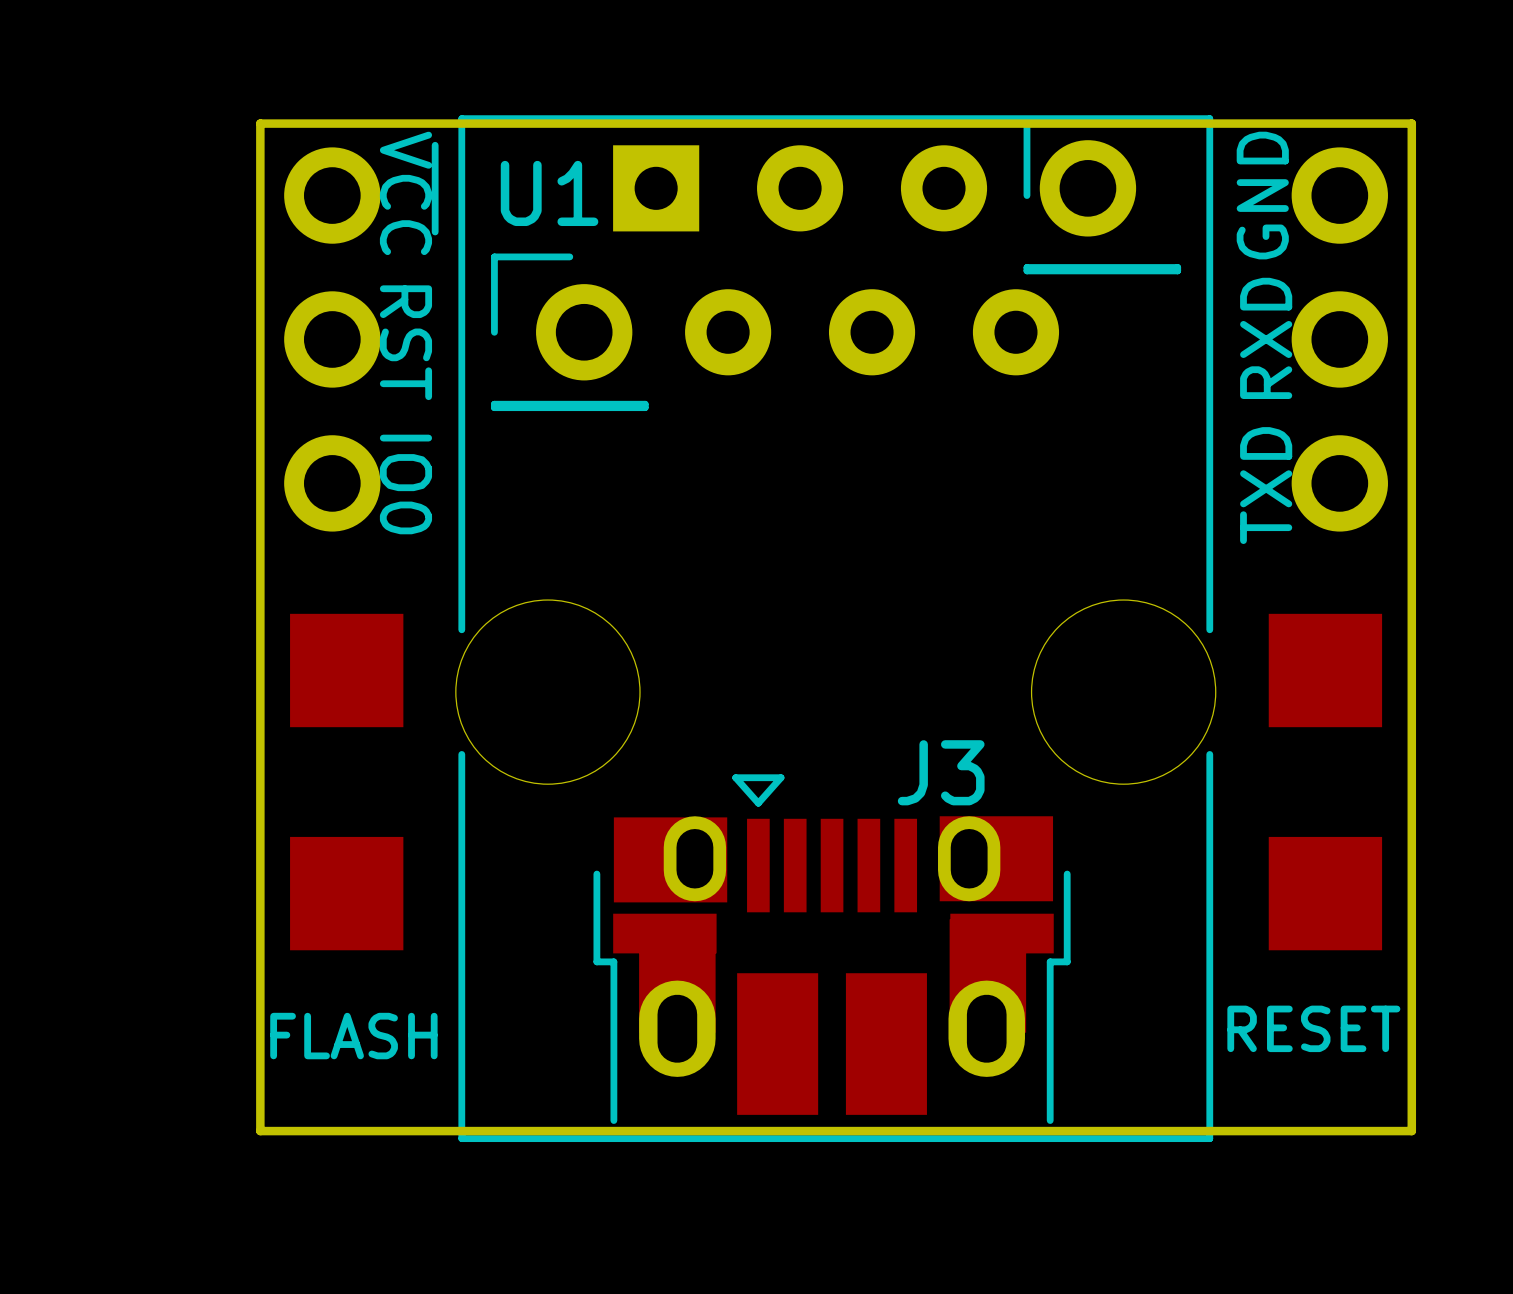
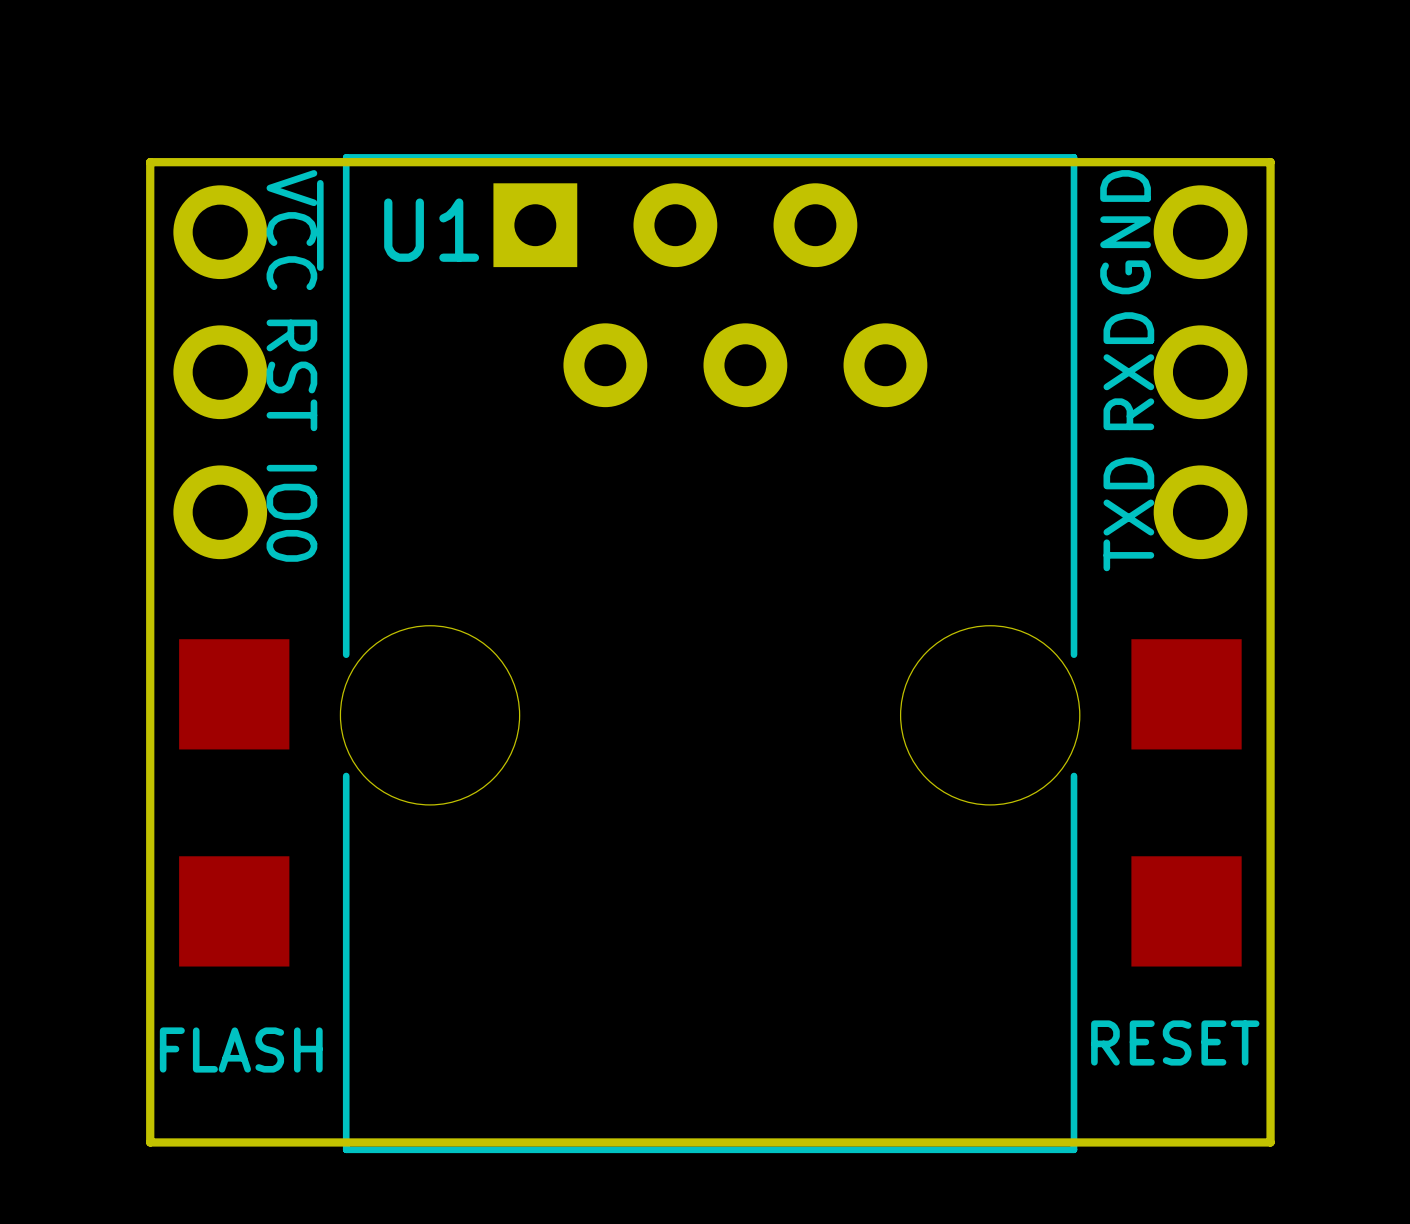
part: (1102, 195) -> none
part: (569, 332) -> none
J3: (832, 949) -> none

